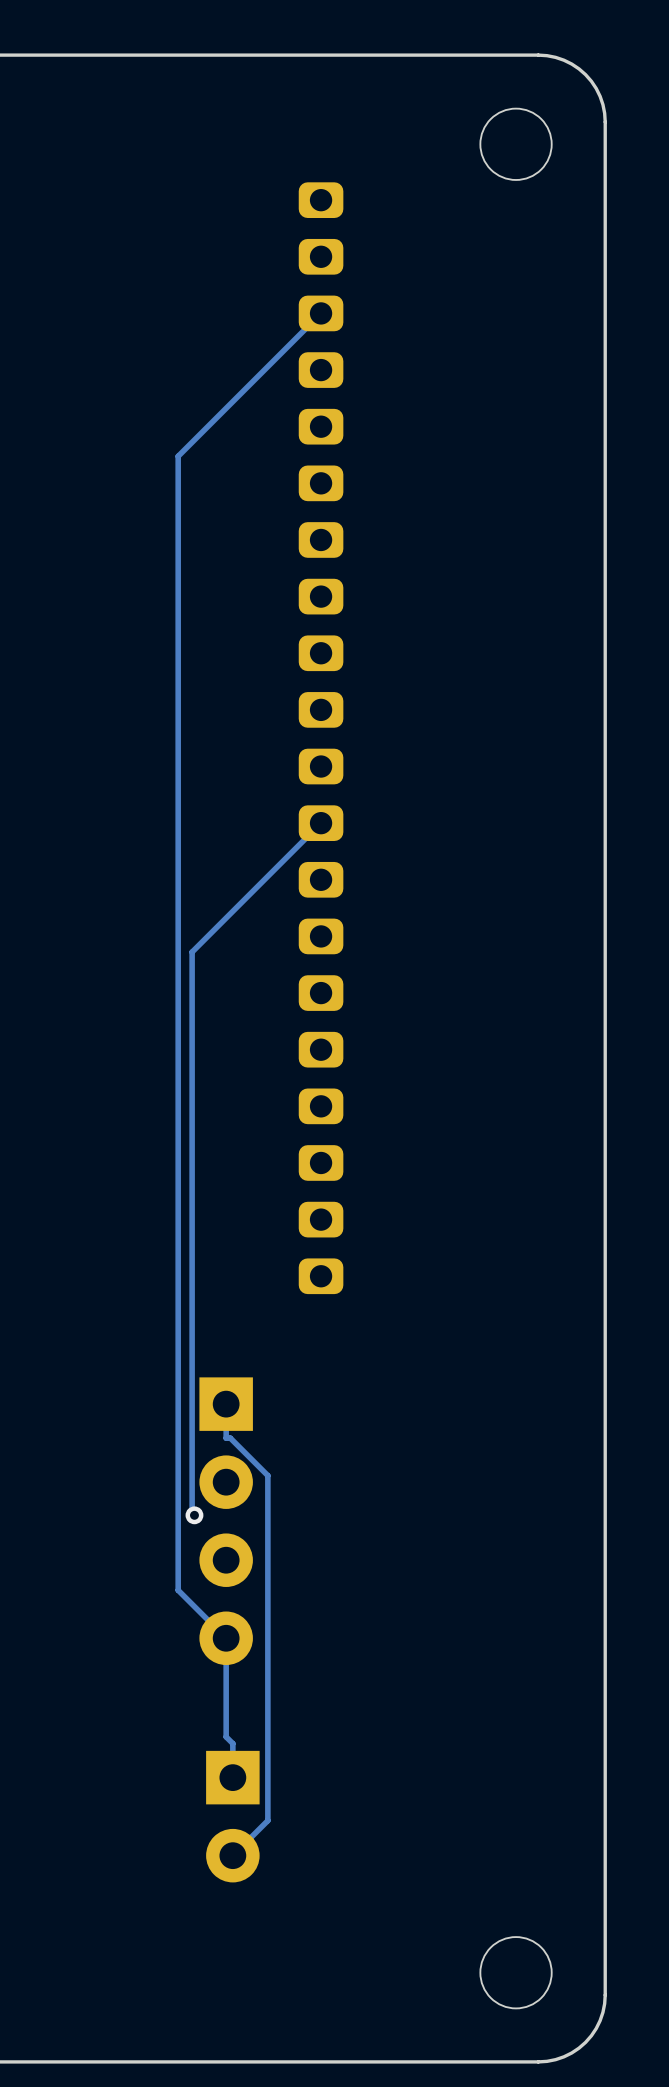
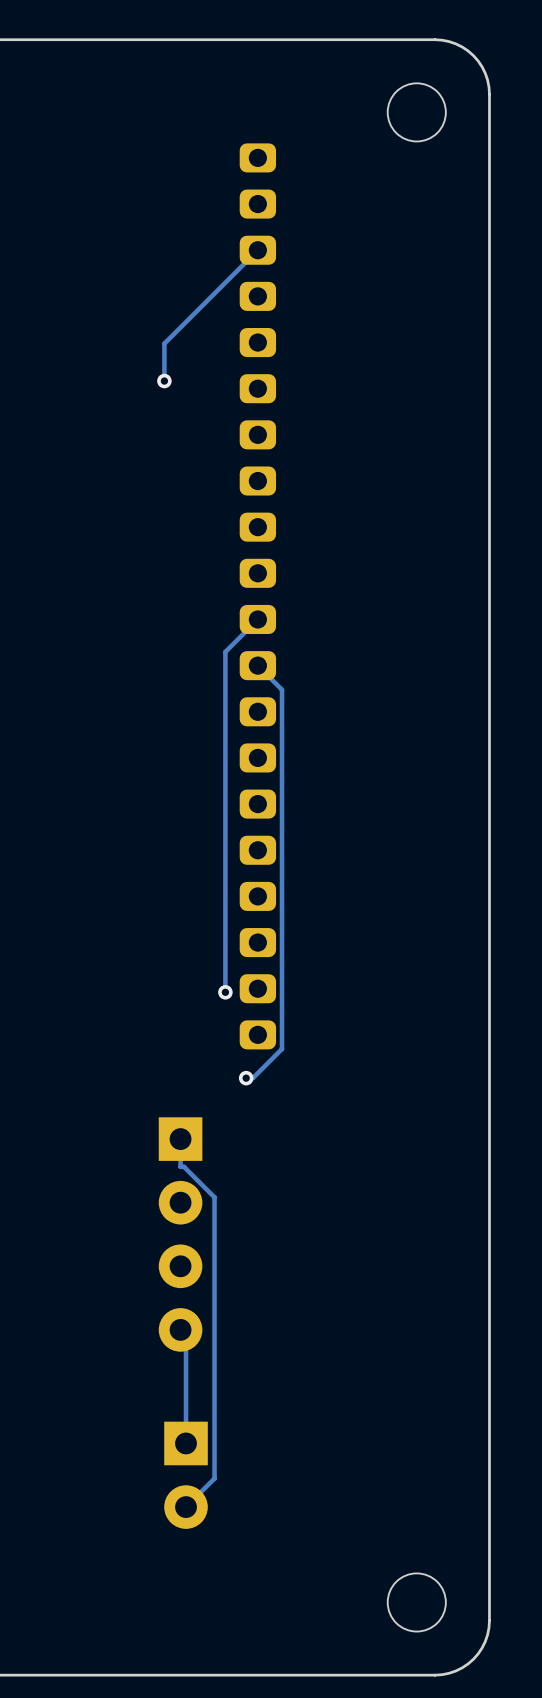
track: (206, 428) (178, 456) (178, 1590) (226, 1638) (226, 1736) (232, 1743) -> (180, 1329) (186, 1335) (186, 1415)
track: none -> (164, 343) (164, 381)
via: none -> (164, 381)
track: none -> (257, 619) (225, 651) (225, 992)
track: (321, 823) (192, 952) (192, 1512) (194, 1515) -> (257, 665) (282, 689) (282, 1049) (252, 1078) (246, 1078)
via: none -> (225, 992)
via: none -> (246, 1078)
via: (194, 1515) -> none

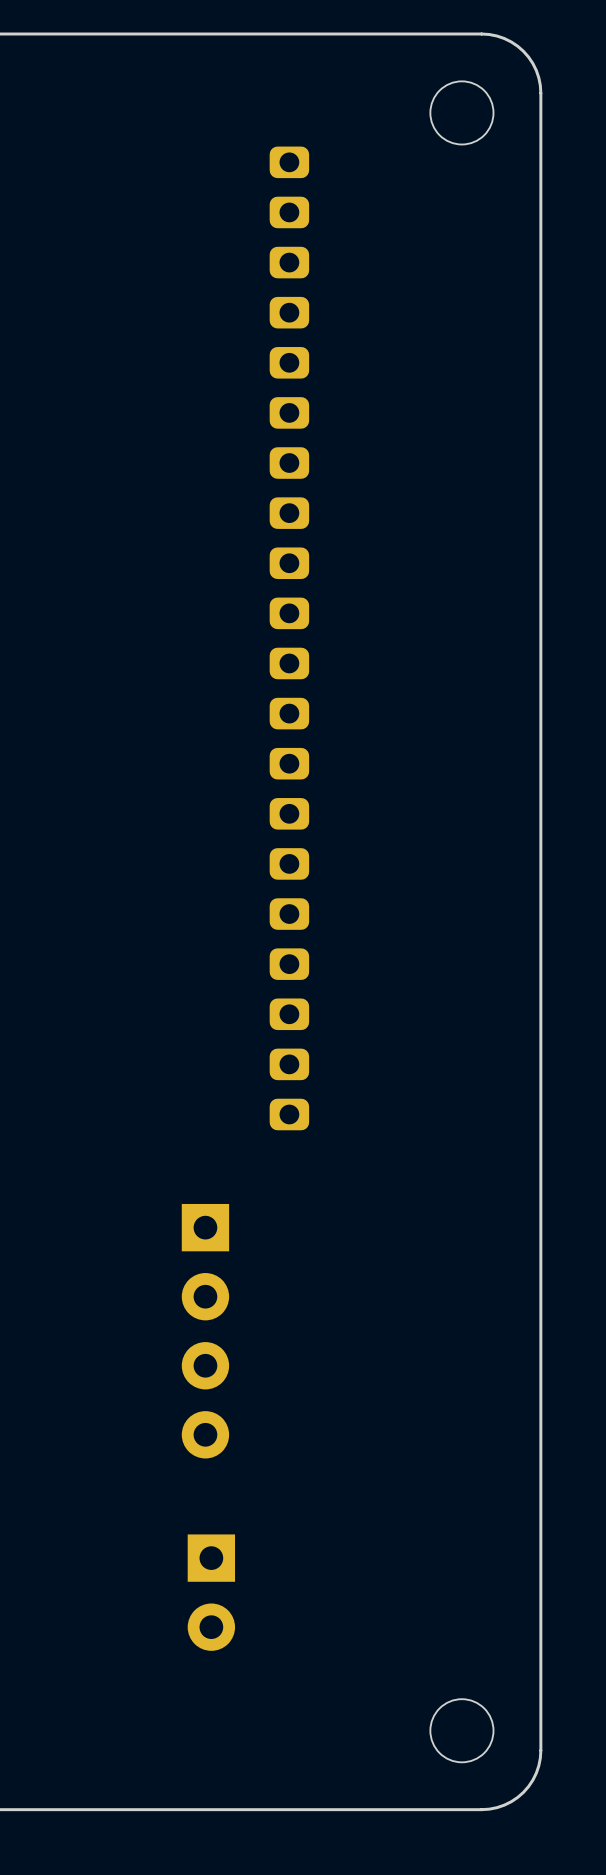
track: (257, 250) (164, 343) (164, 381) -> none
via: (164, 381) -> none
track: (257, 619) (225, 651) (225, 992) -> none
track: (257, 665) (282, 689) (282, 1049) (252, 1078) (246, 1078) -> none
via: (225, 992) -> none
via: (246, 1078) -> none
track: (180, 1139) (180, 1166) (184, 1166) (214, 1197) (214, 1478) (186, 1507) -> none
track: (180, 1329) (186, 1335) (186, 1443) -> none

